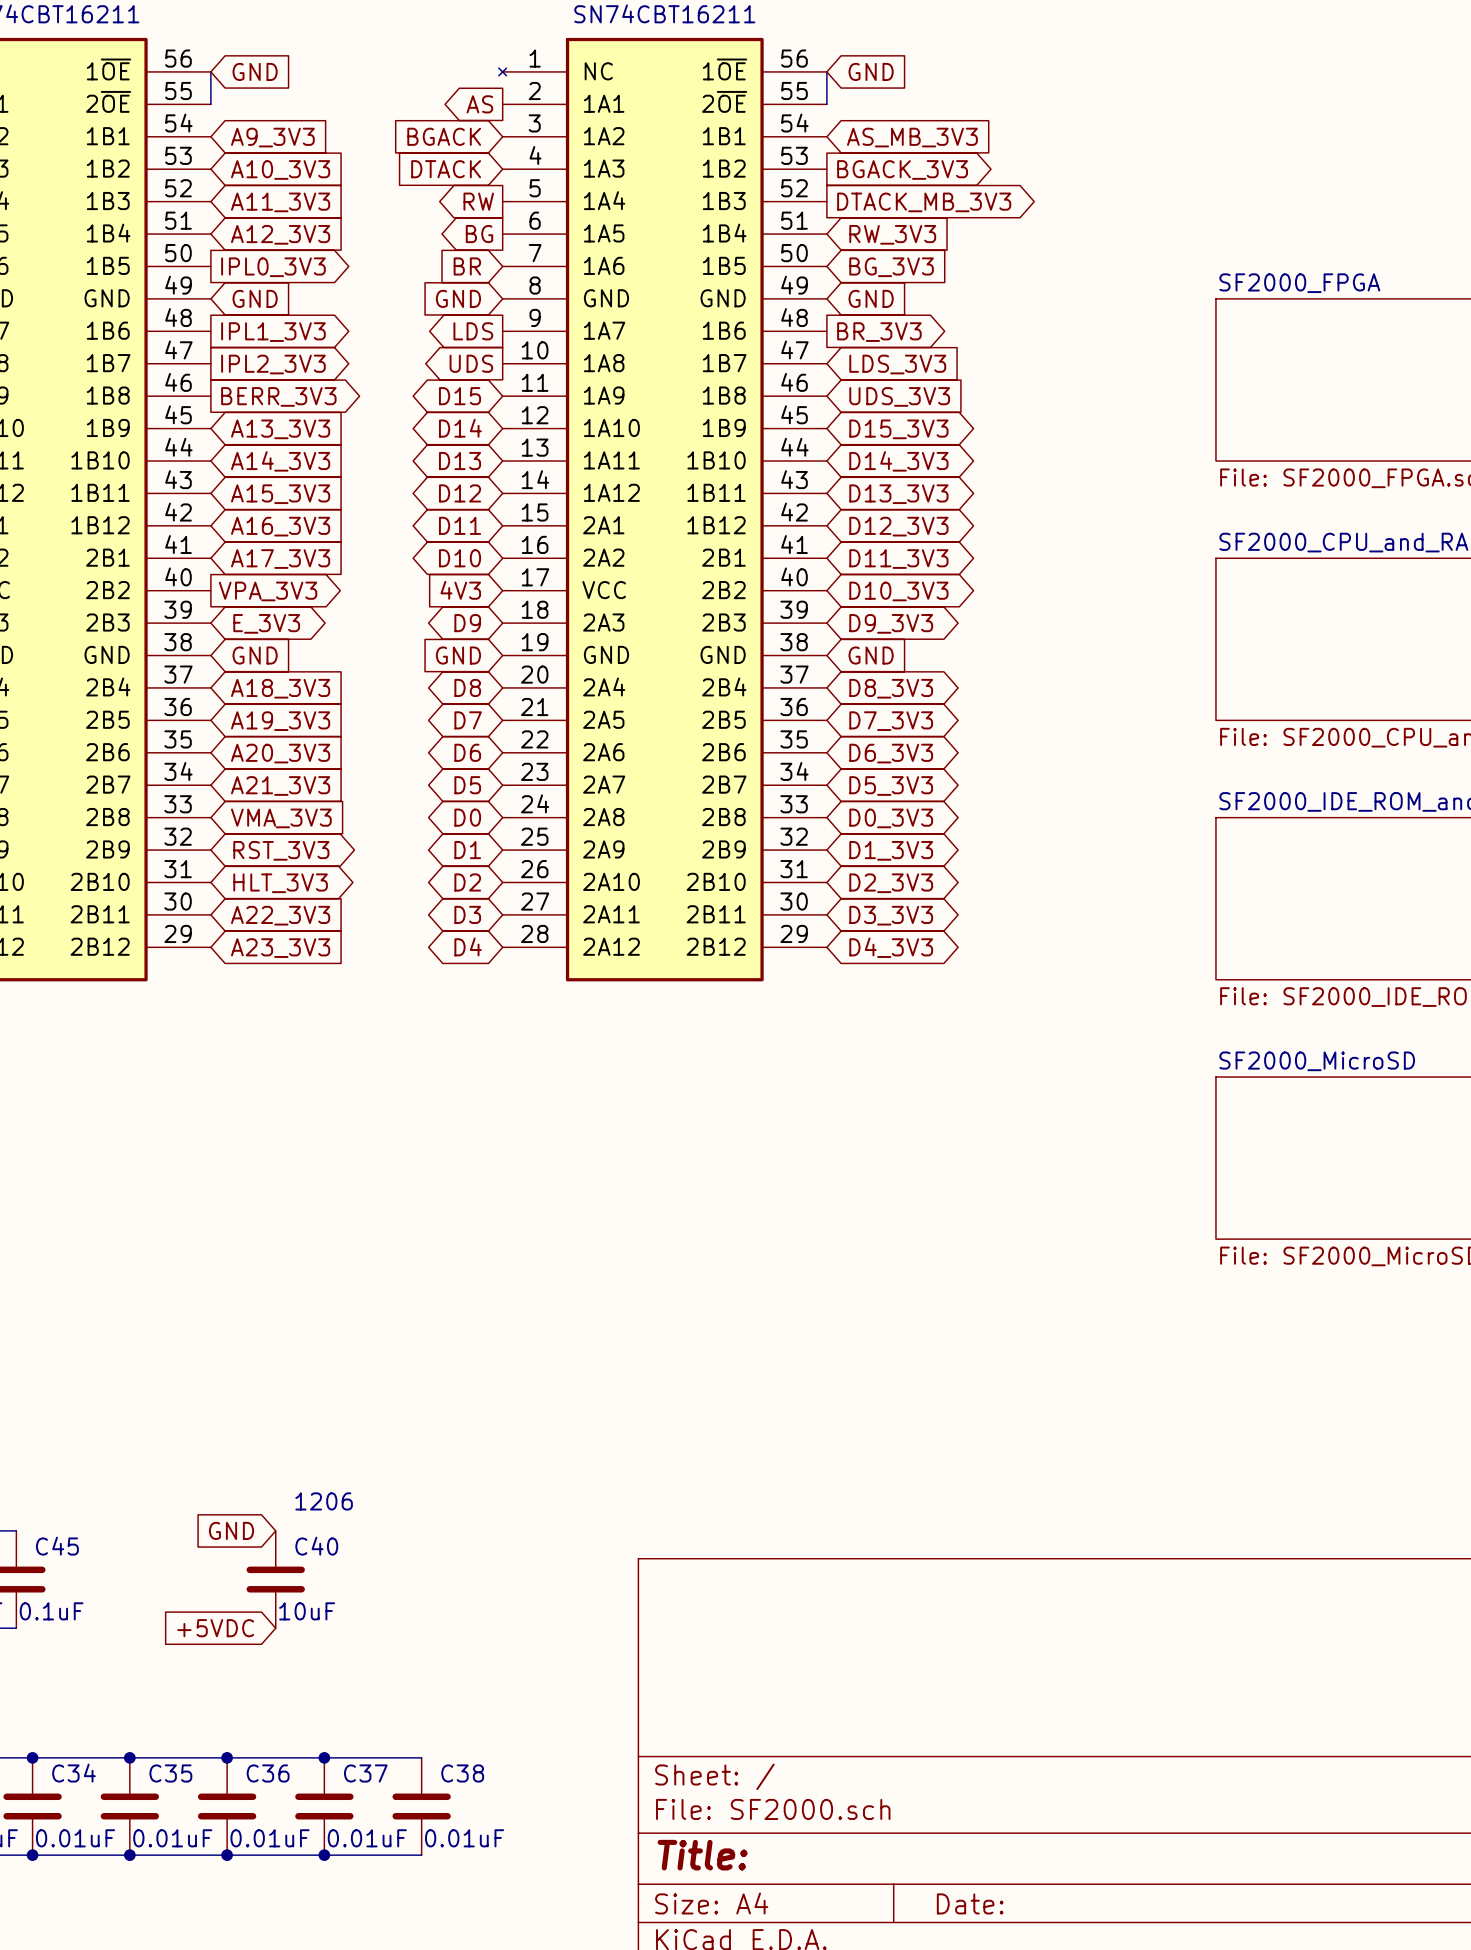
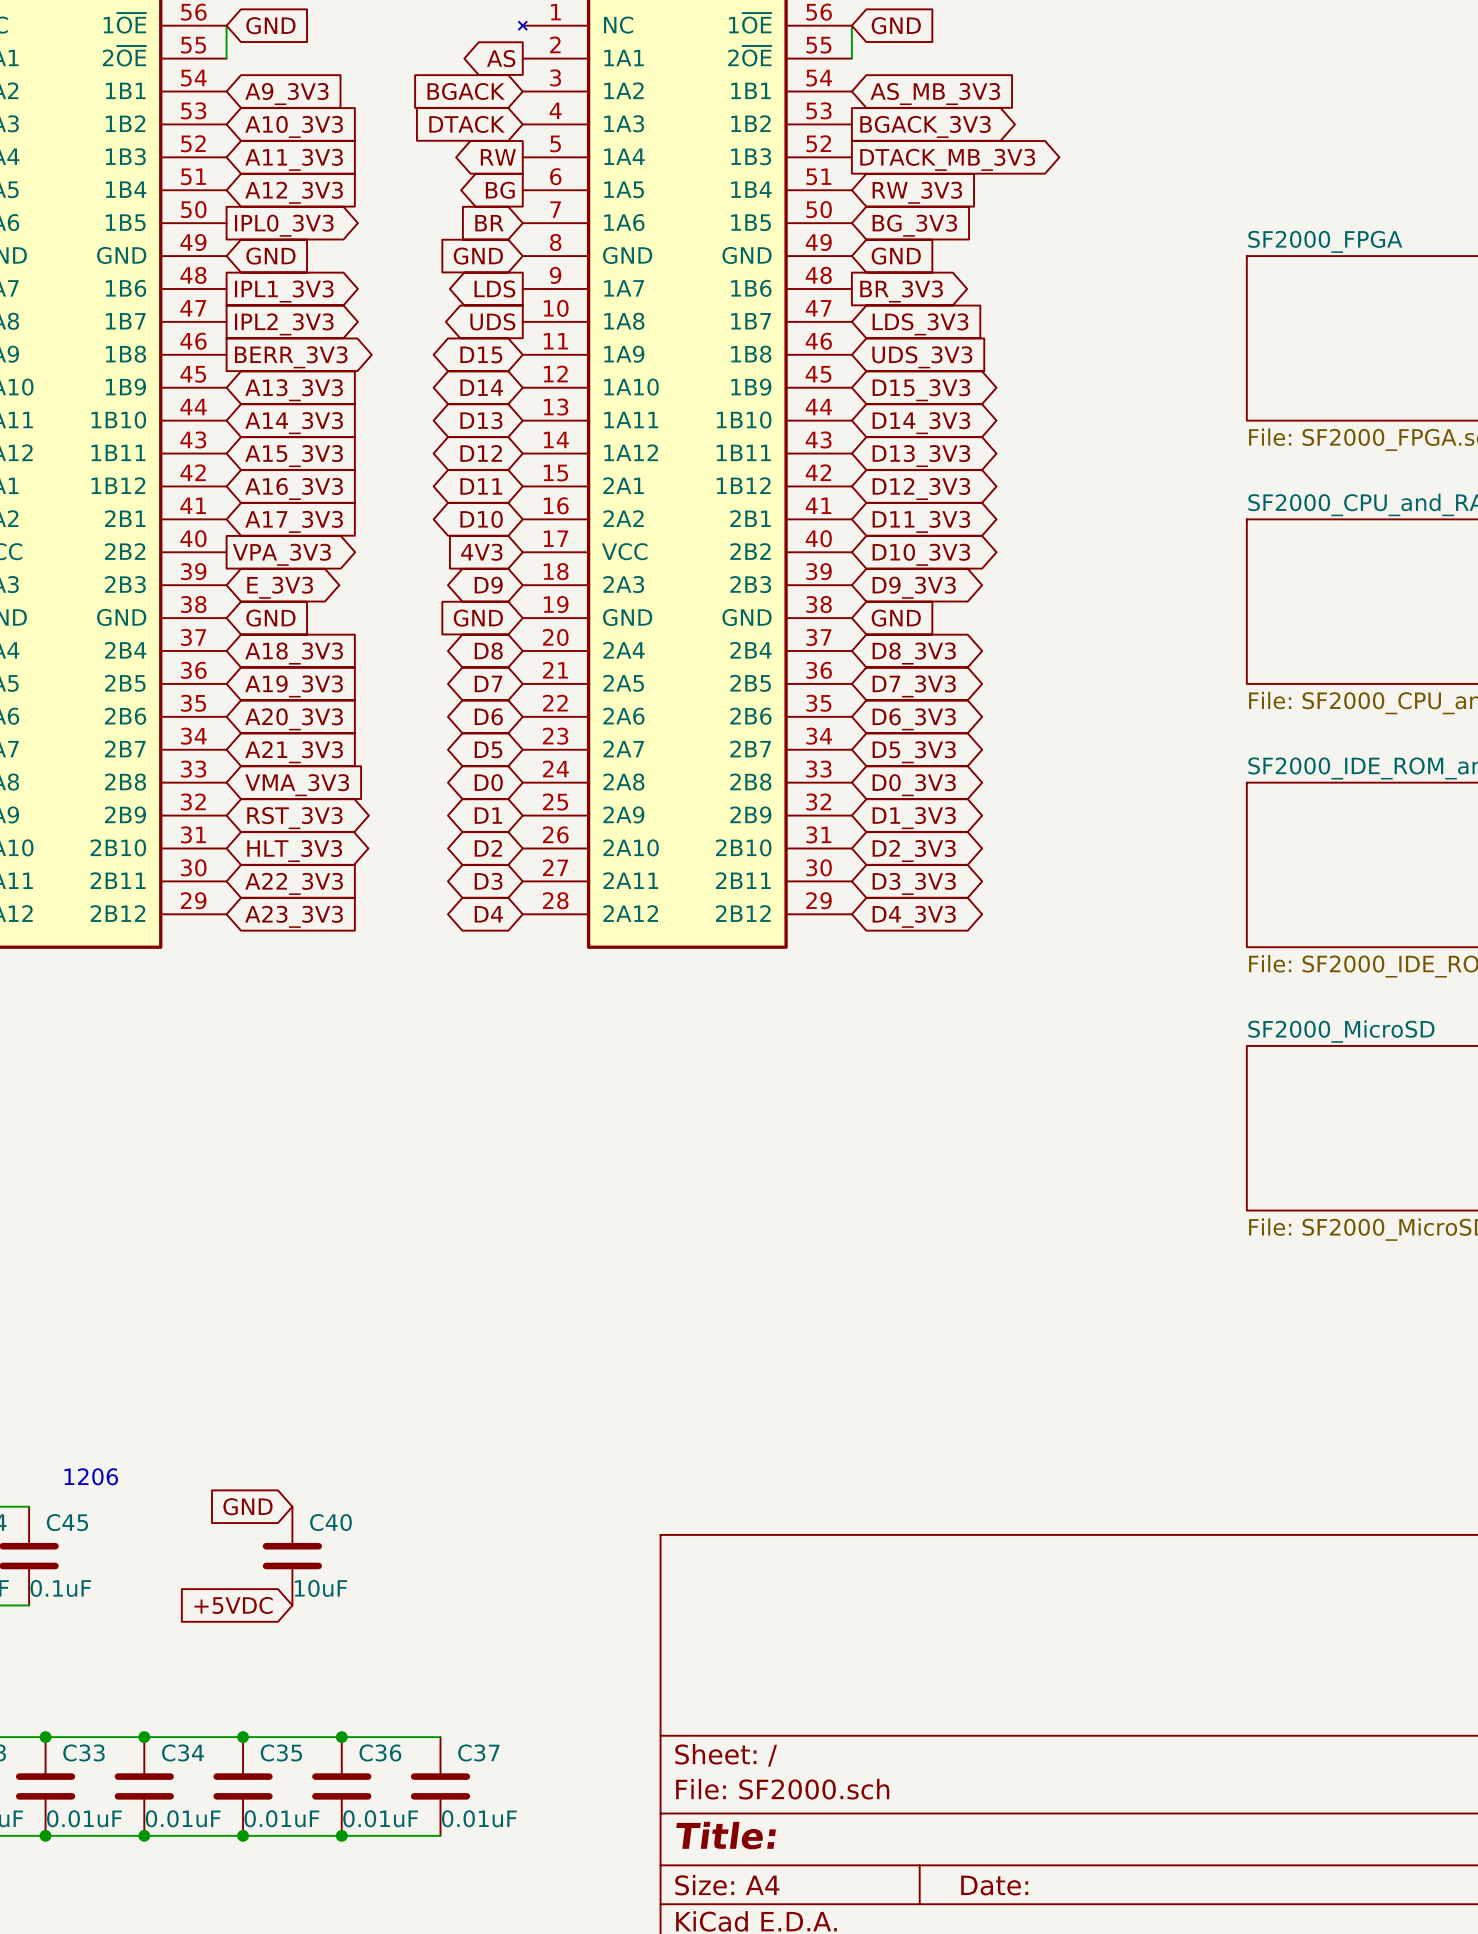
text position: 1206 (324, 1501) -> 1206 (91, 1476)
C34 name: C34 (73, 1773) -> C33 (83, 1752)
C35 name: C35 (170, 1773) -> C34 (182, 1752)
C36 name: C36 (268, 1773) -> C35 (281, 1752)
C37 name: C37 (365, 1773) -> C36 (380, 1752)
C38 name: C38 (462, 1773) -> C37 (478, 1752)

